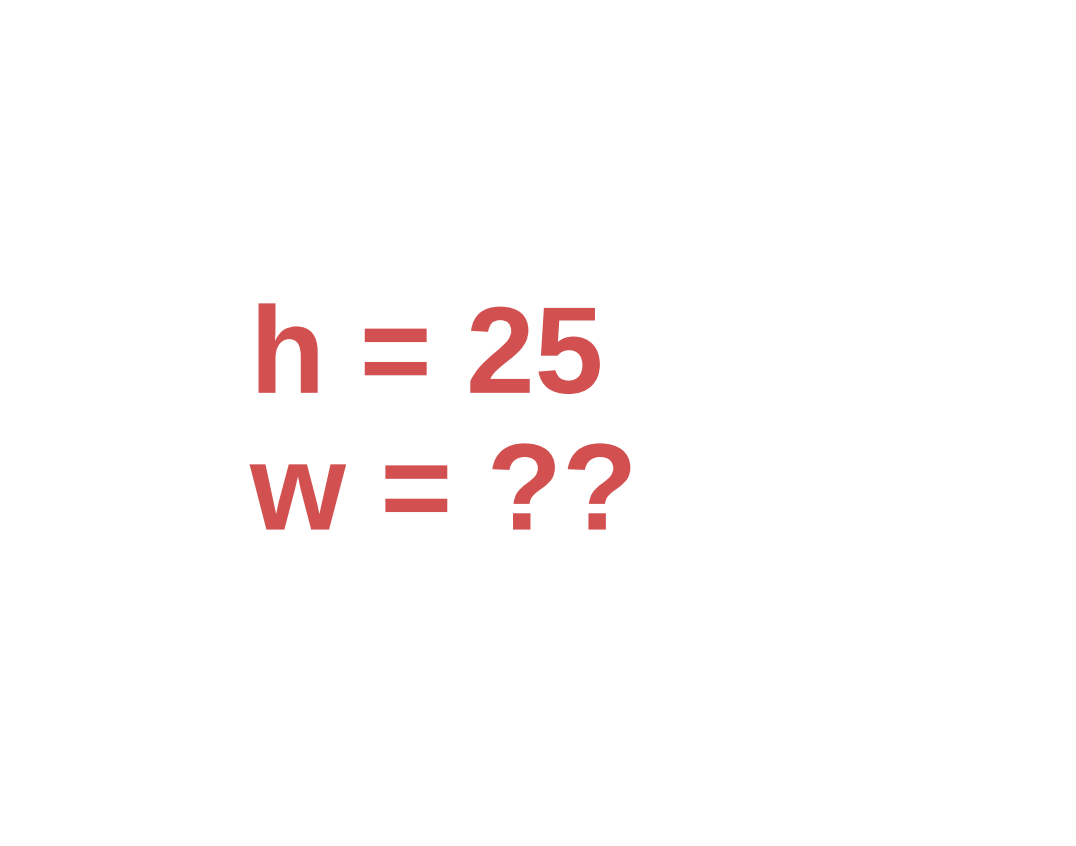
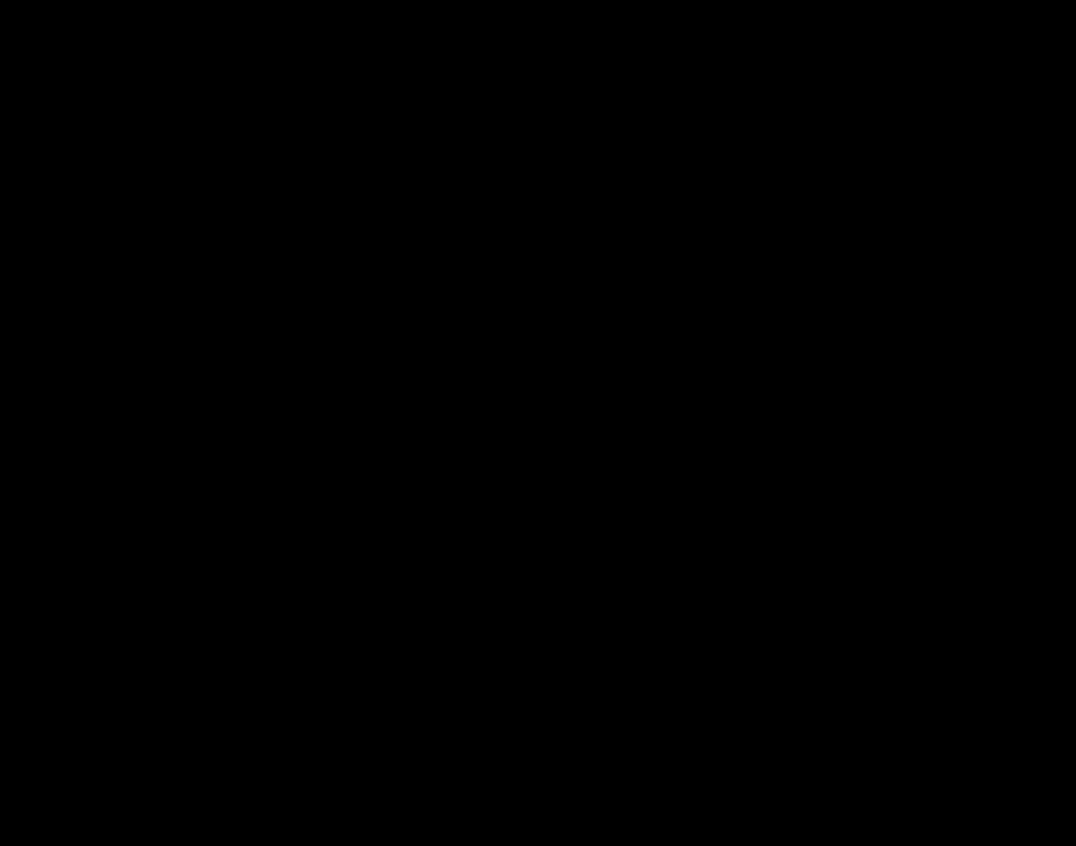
text: h = 25 (429, 348) -> none
text: w = ?? (439, 486) -> none

